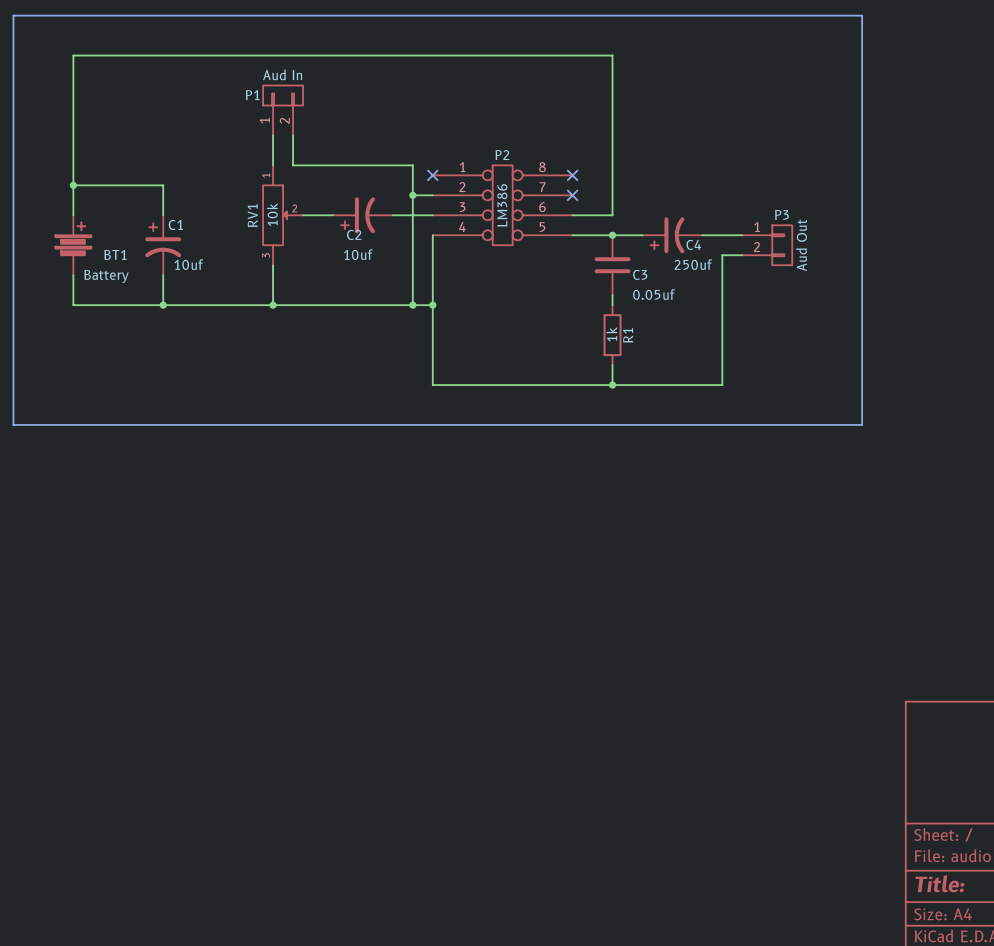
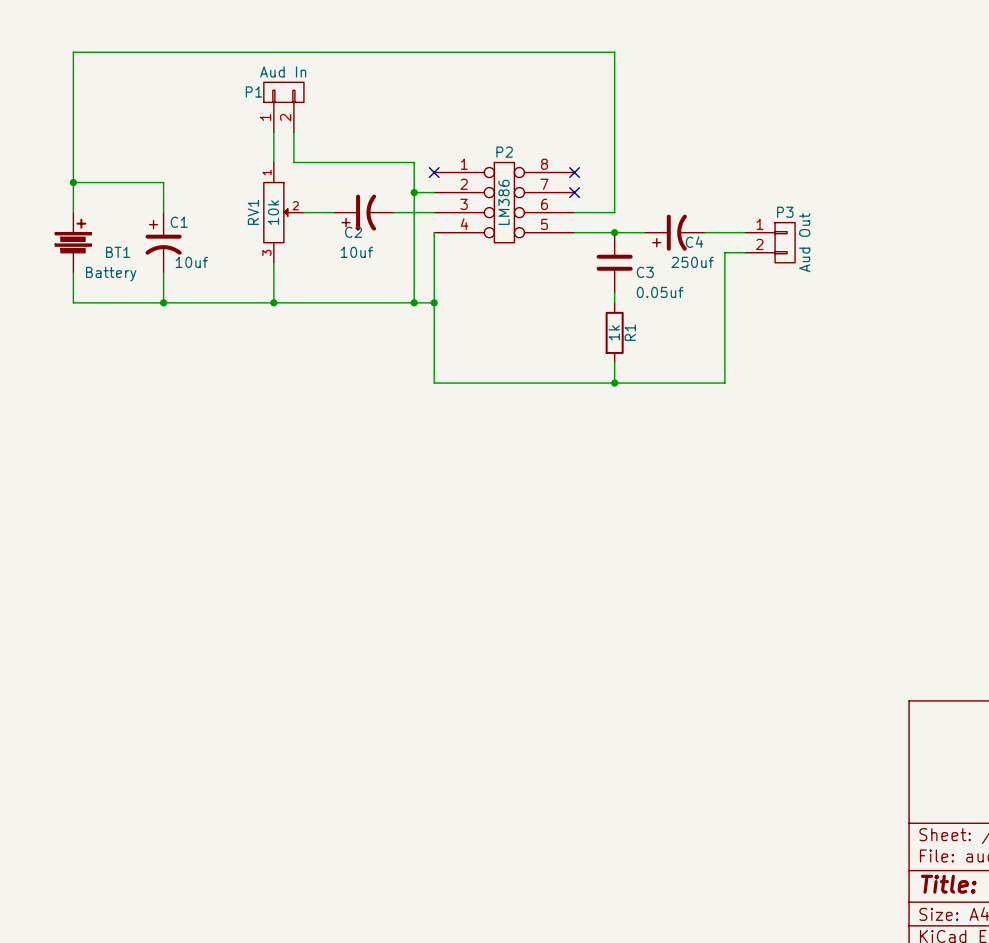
bus: (13, 15) (862, 15) (862, 424) (13, 424) (13, 15) -> none

